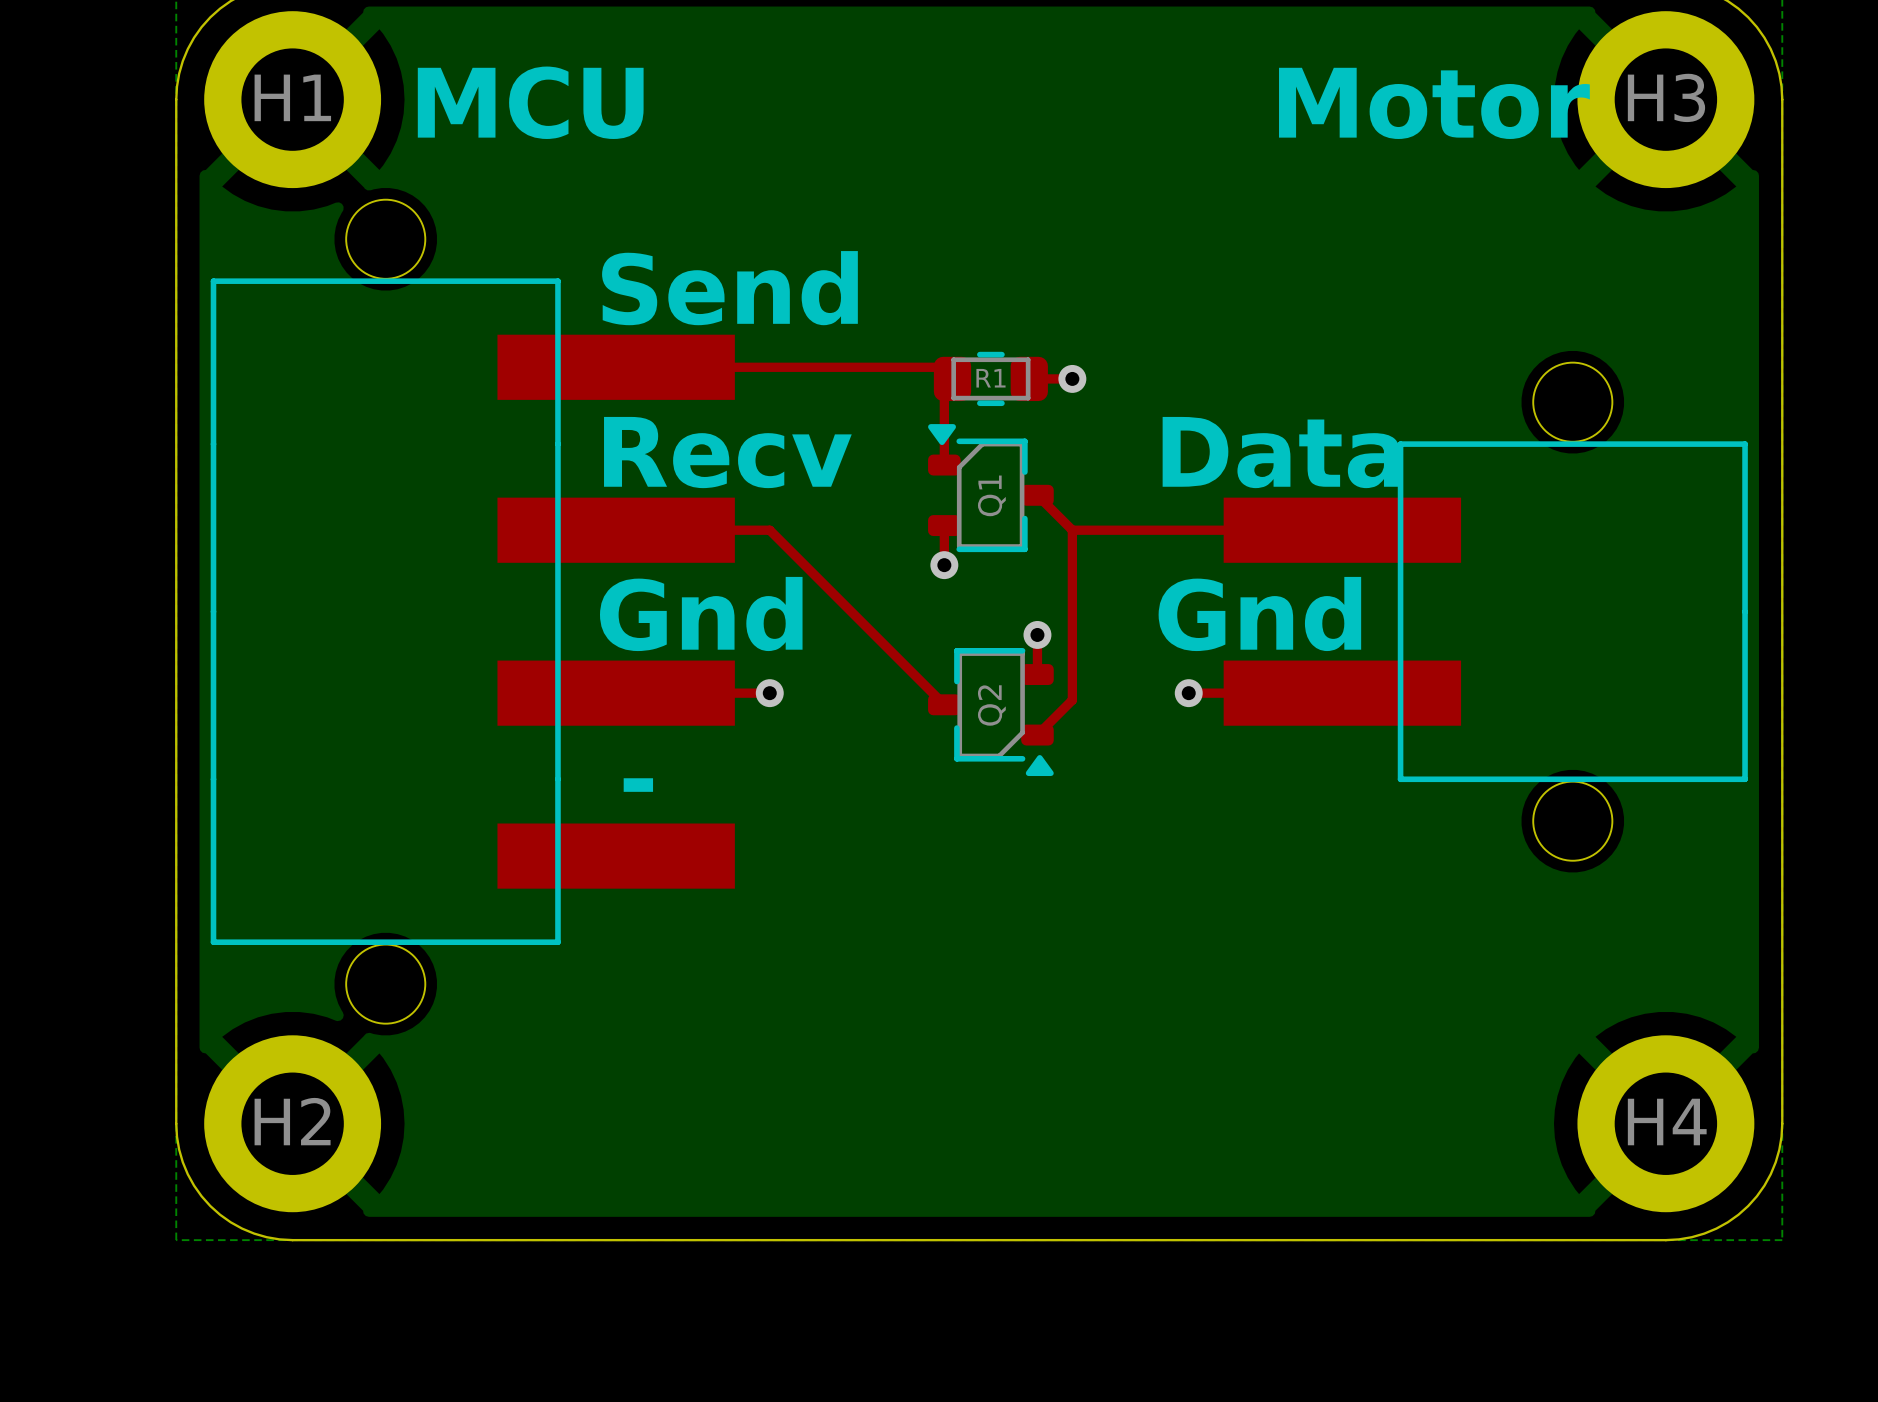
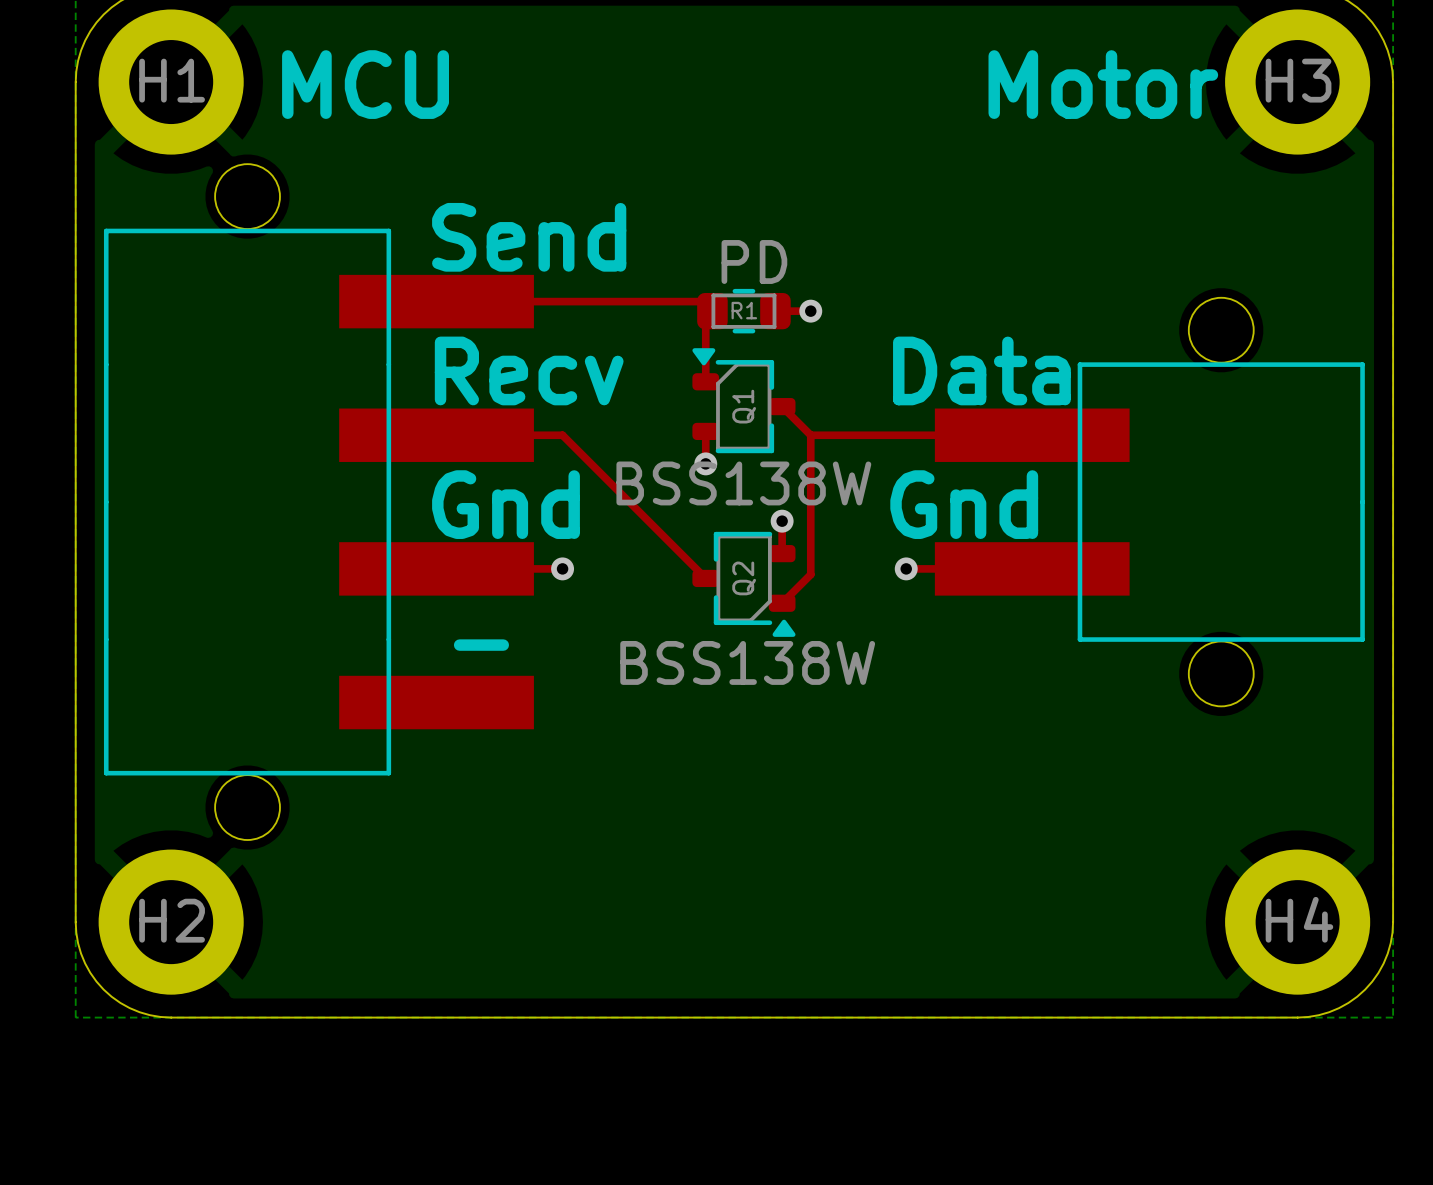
R1 value: none -> PD (754, 261)
Q1 value: none -> BSS138W (743, 483)
Q2 value: none -> BSS138W (747, 662)

